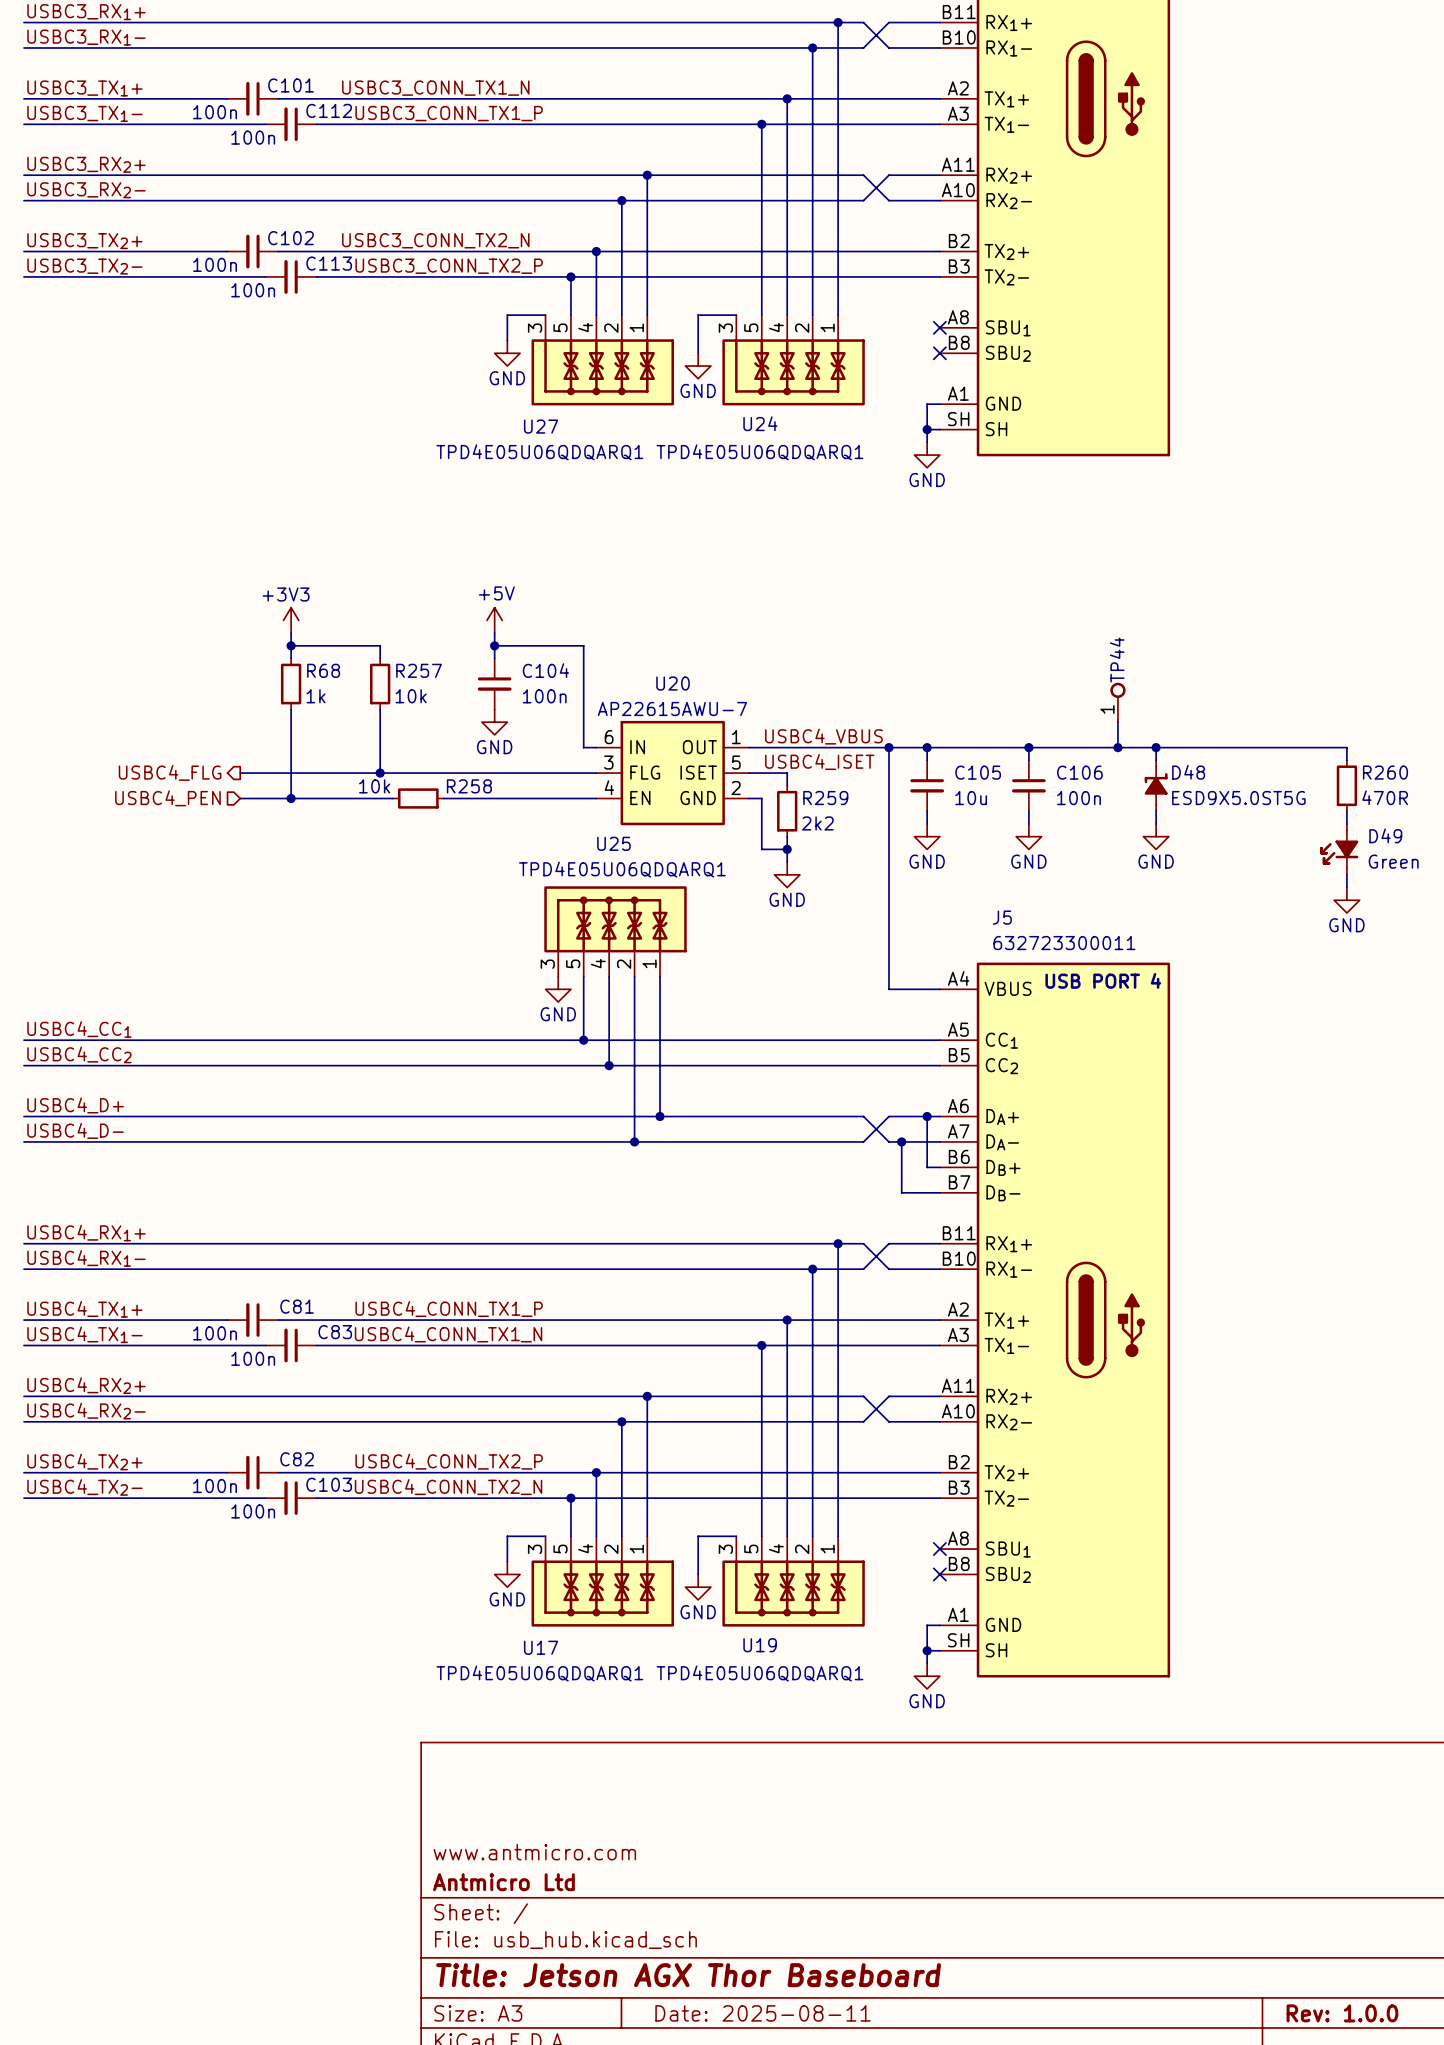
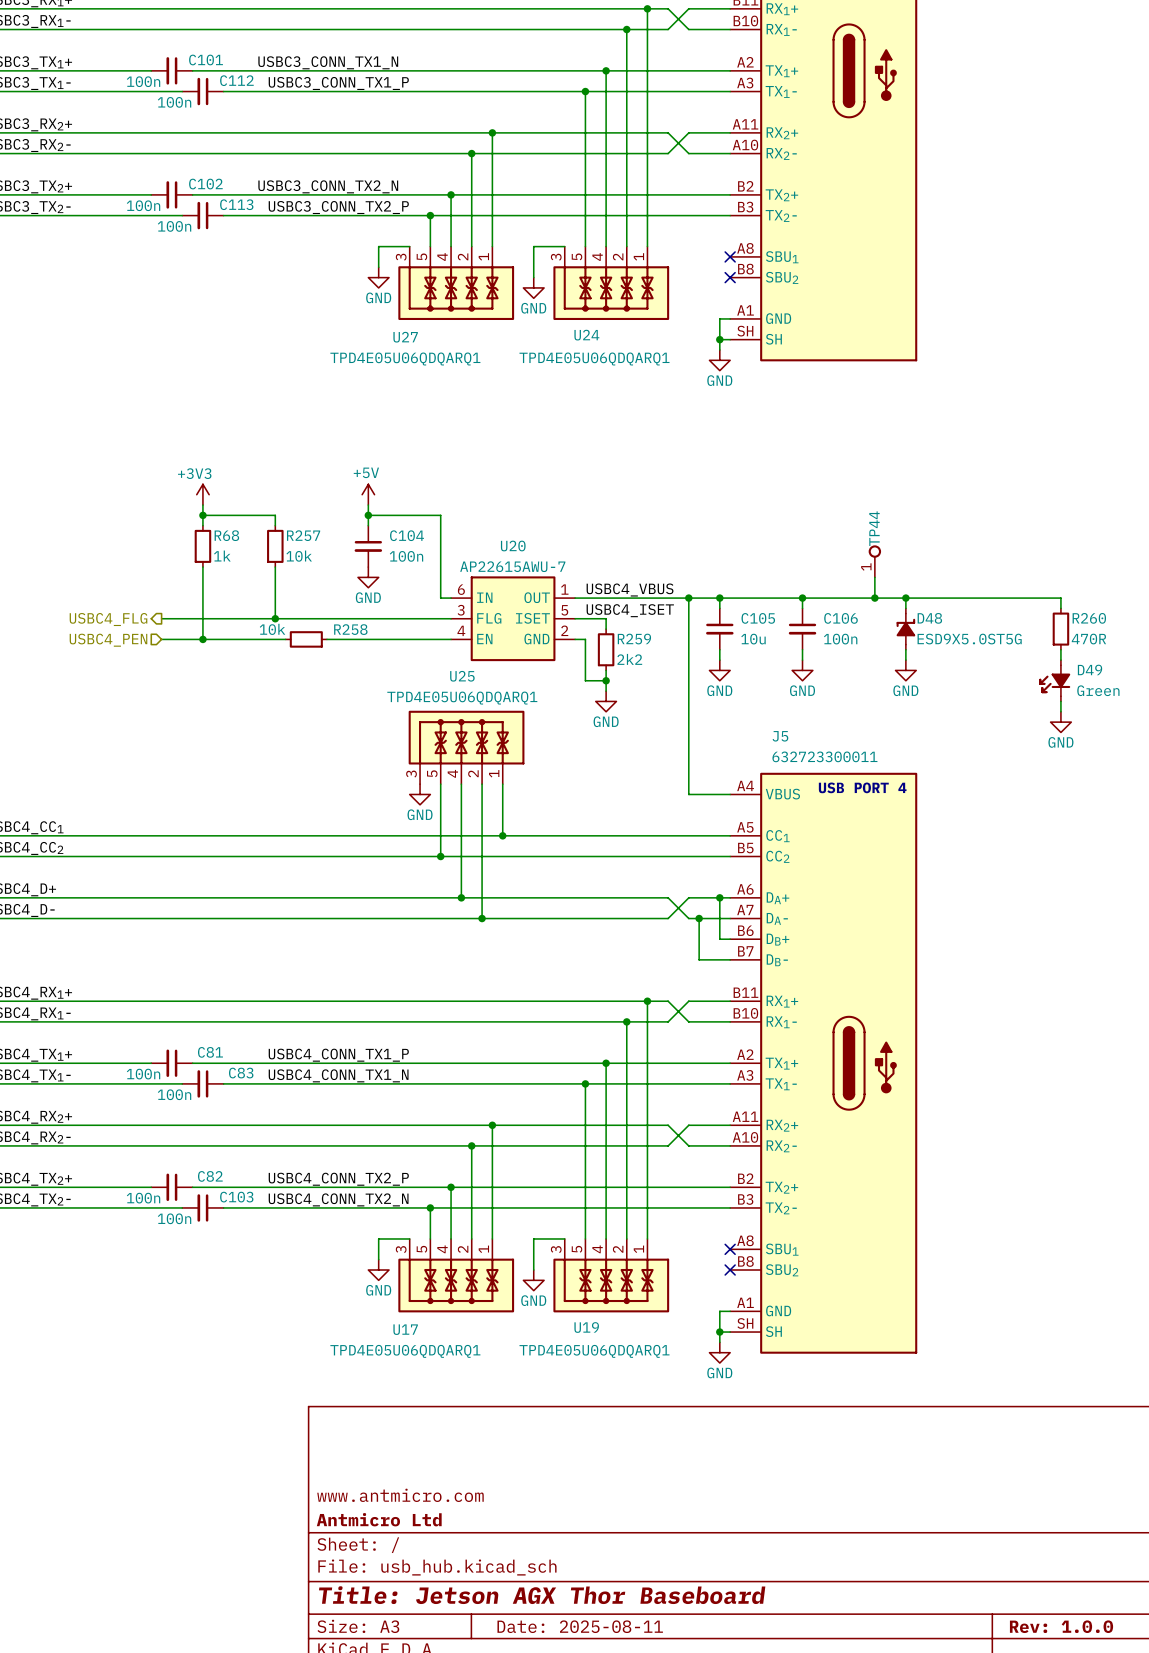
wire: none -> (440, 835) (440, 856)
junction: (583, 1040) -> none
wire: (660, 1040) (660, 1116) -> none
junction: none -> (502, 835)
junction: none -> (440, 856)
wire: none -> (461, 856) (461, 897)
junction: (609, 1065) -> none
junction: none -> (461, 897)
junction: (660, 1116) -> none

